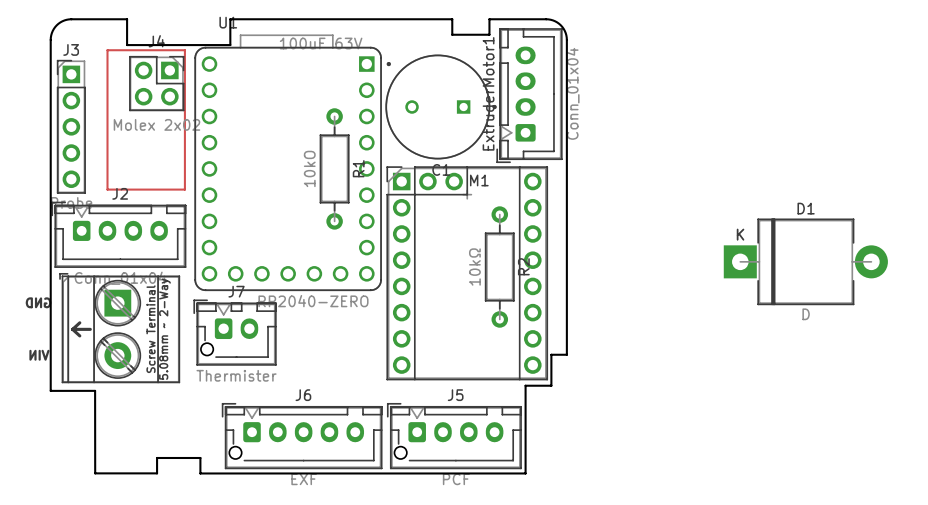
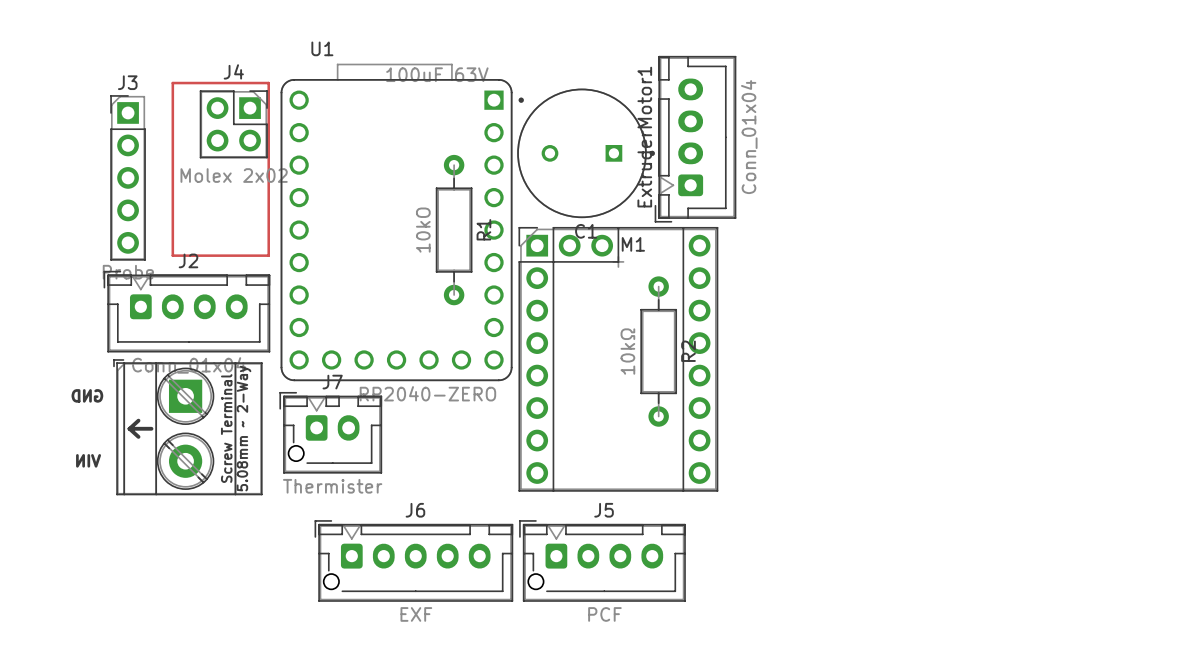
board edge: (71, 19) (127, 19) (127, 45) (230, 45) (230, 19) (452, 19) (452, 34) (489, 34) (489, 19) (548, 19) (560, 25) (564, 30) (566, 39) (566, 354) (551, 354) (551, 385) (525, 385) (525, 473) (200, 473) (200, 457) (157, 457) (157, 473) (95, 473) (95, 390) (50, 390) (50, 39) (51, 33) (56, 25) (62, 21) (71, 19) -> none
D1: D (805, 261) -> none

